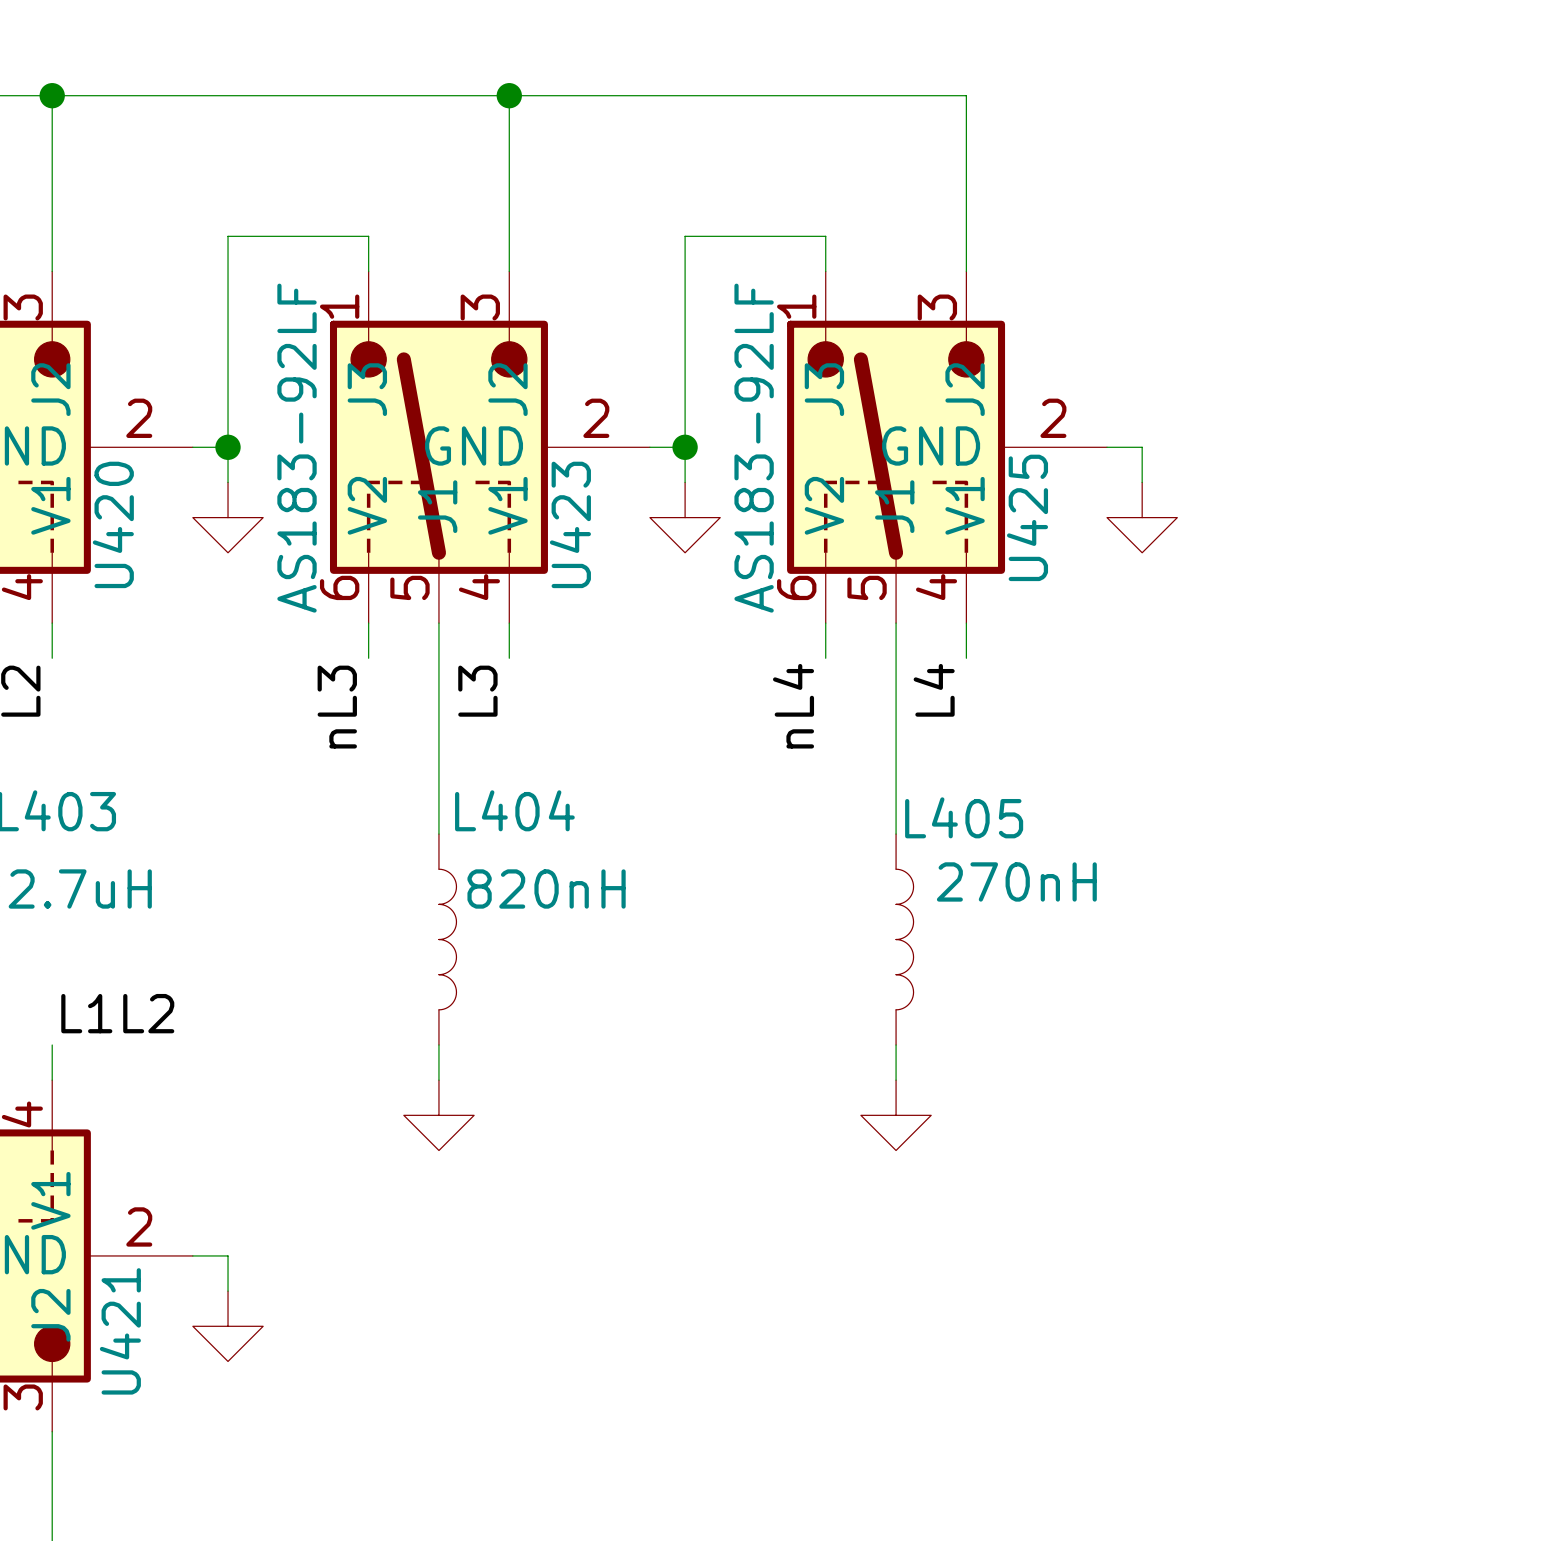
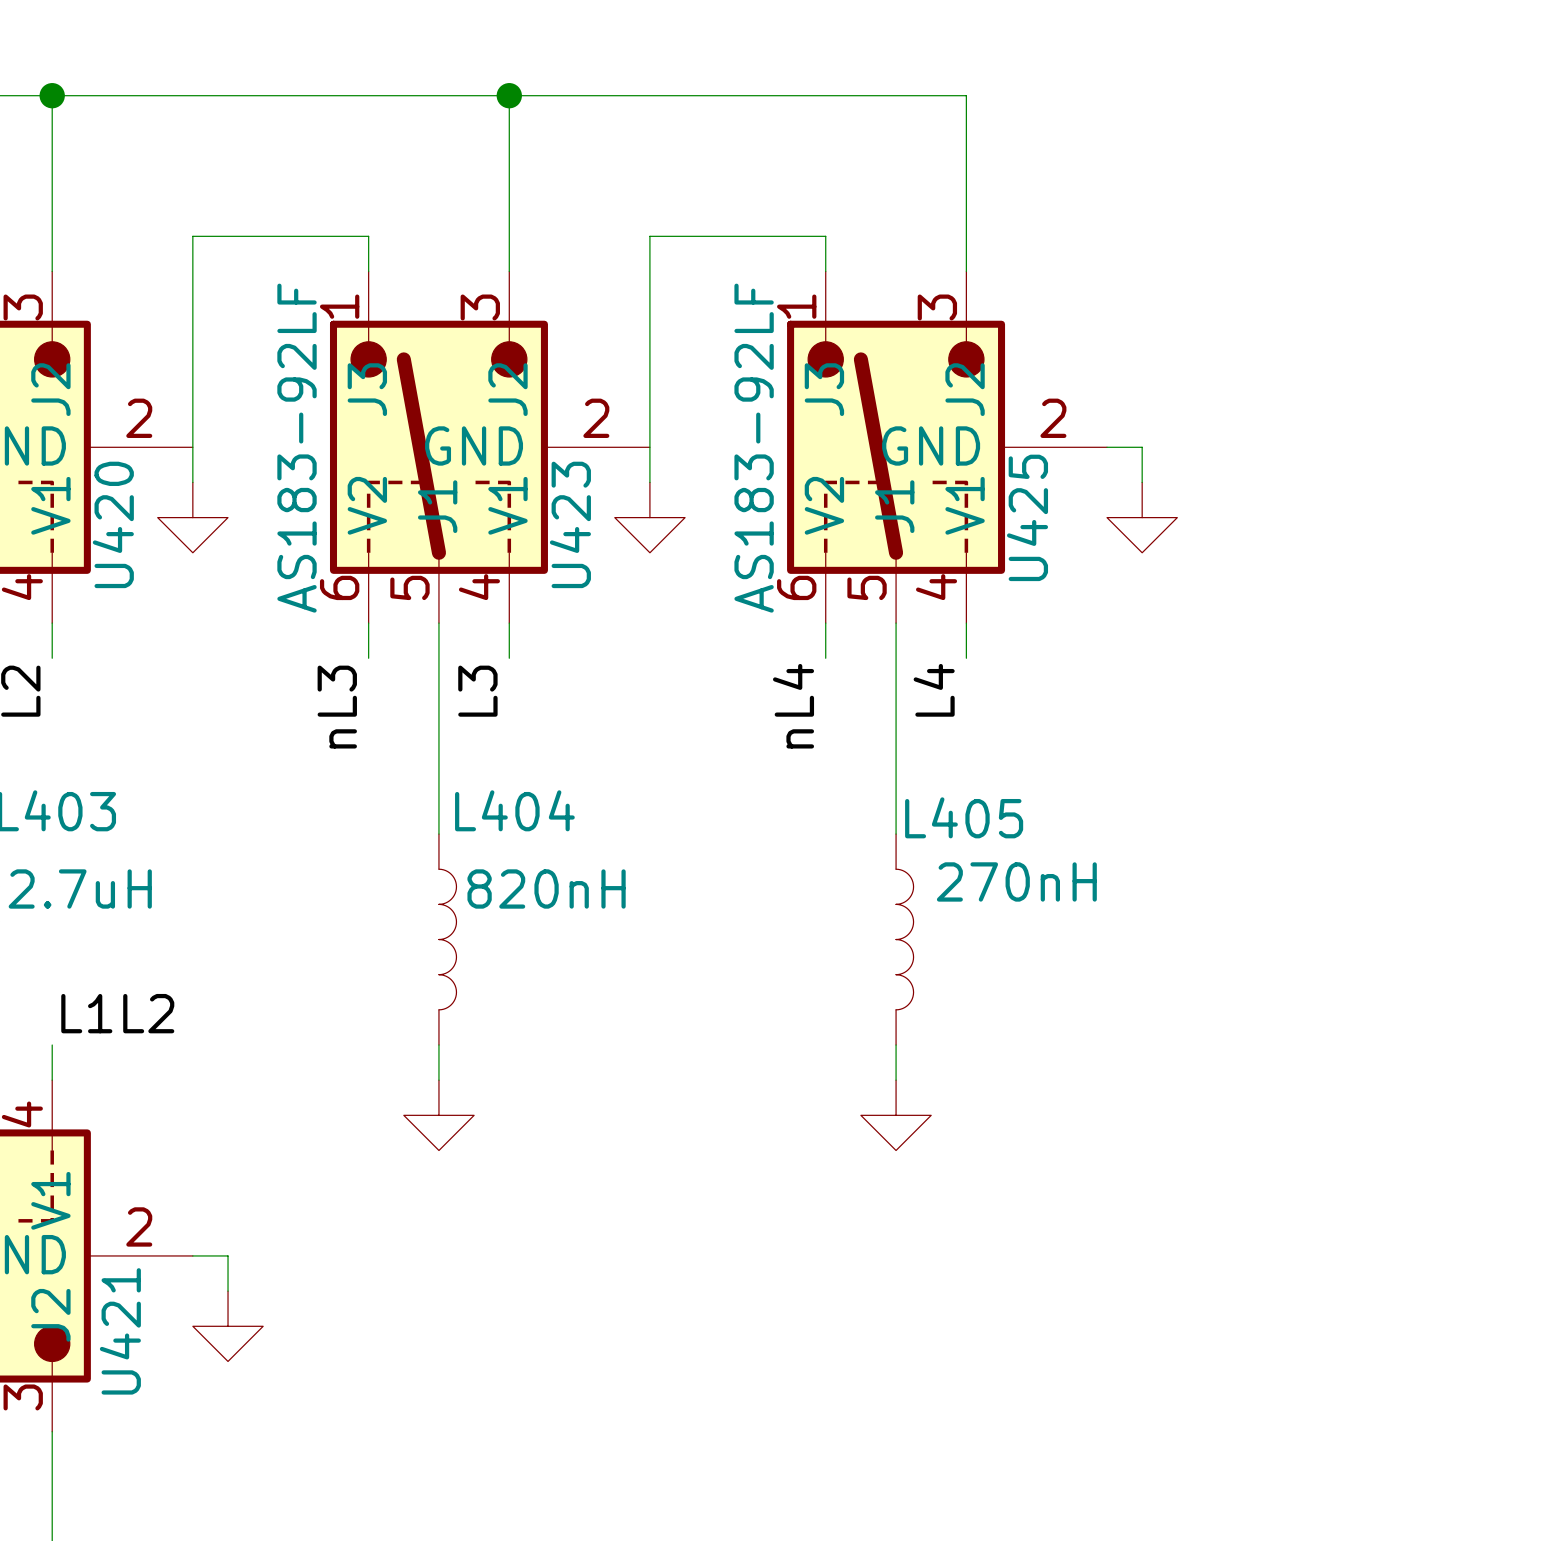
wire: (228, 236) (228, 482) -> (228, 236) (192, 236) (192, 482)
wire: (685, 236) (685, 482) -> (685, 236) (649, 236) (649, 482)
wire: (192, 447) (228, 447) -> none
junction: (228, 447) -> none
wire: (649, 447) (685, 447) -> none
junction: (685, 447) -> none
power symbol position: (228, 517) -> (192, 517)
power symbol position: (685, 517) -> (649, 517)

